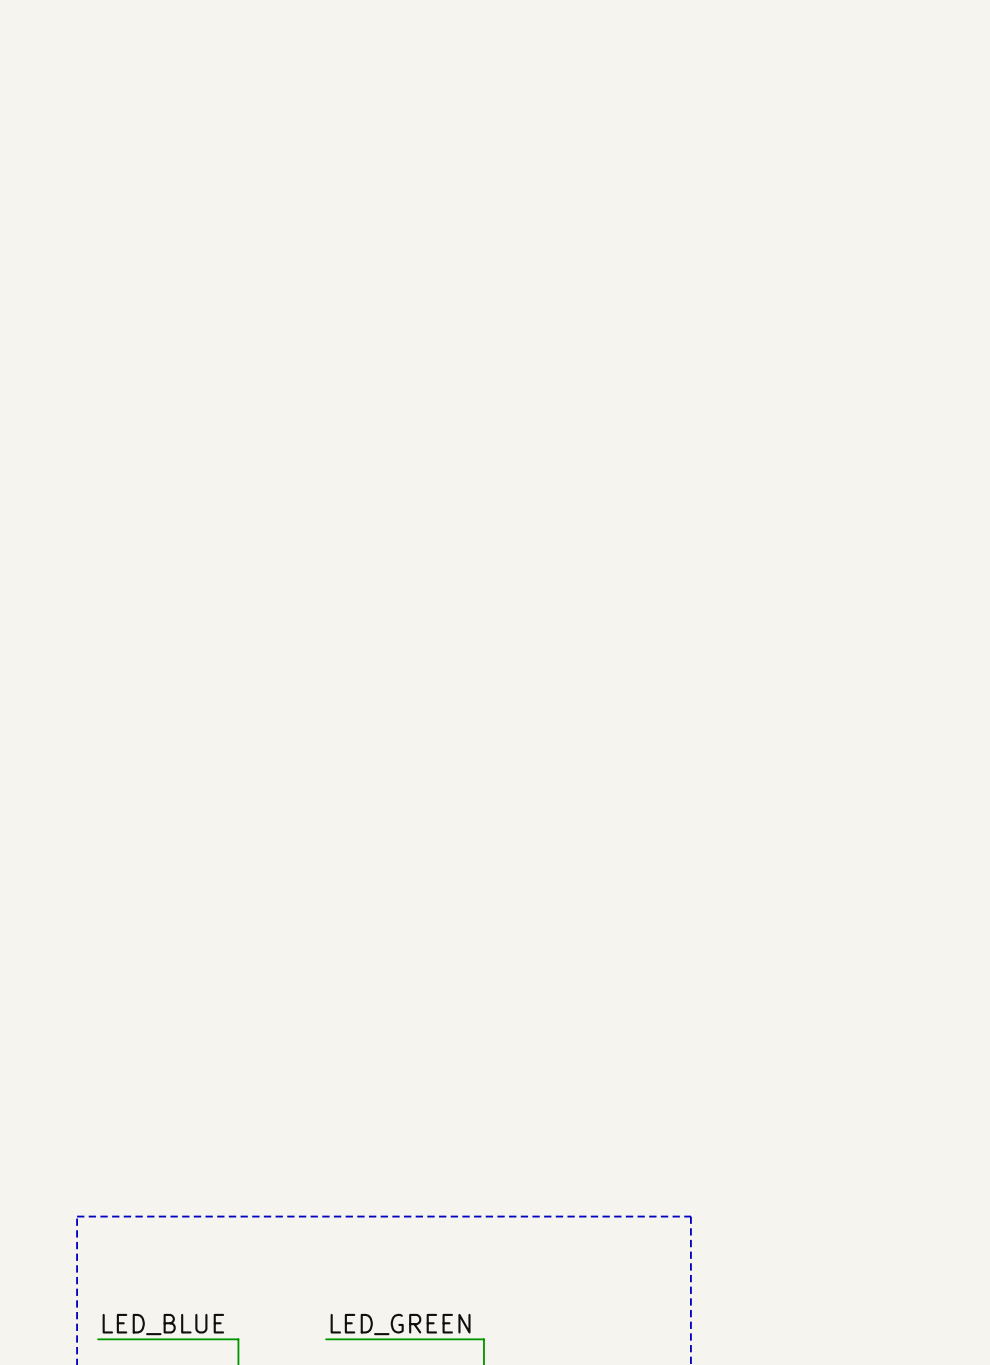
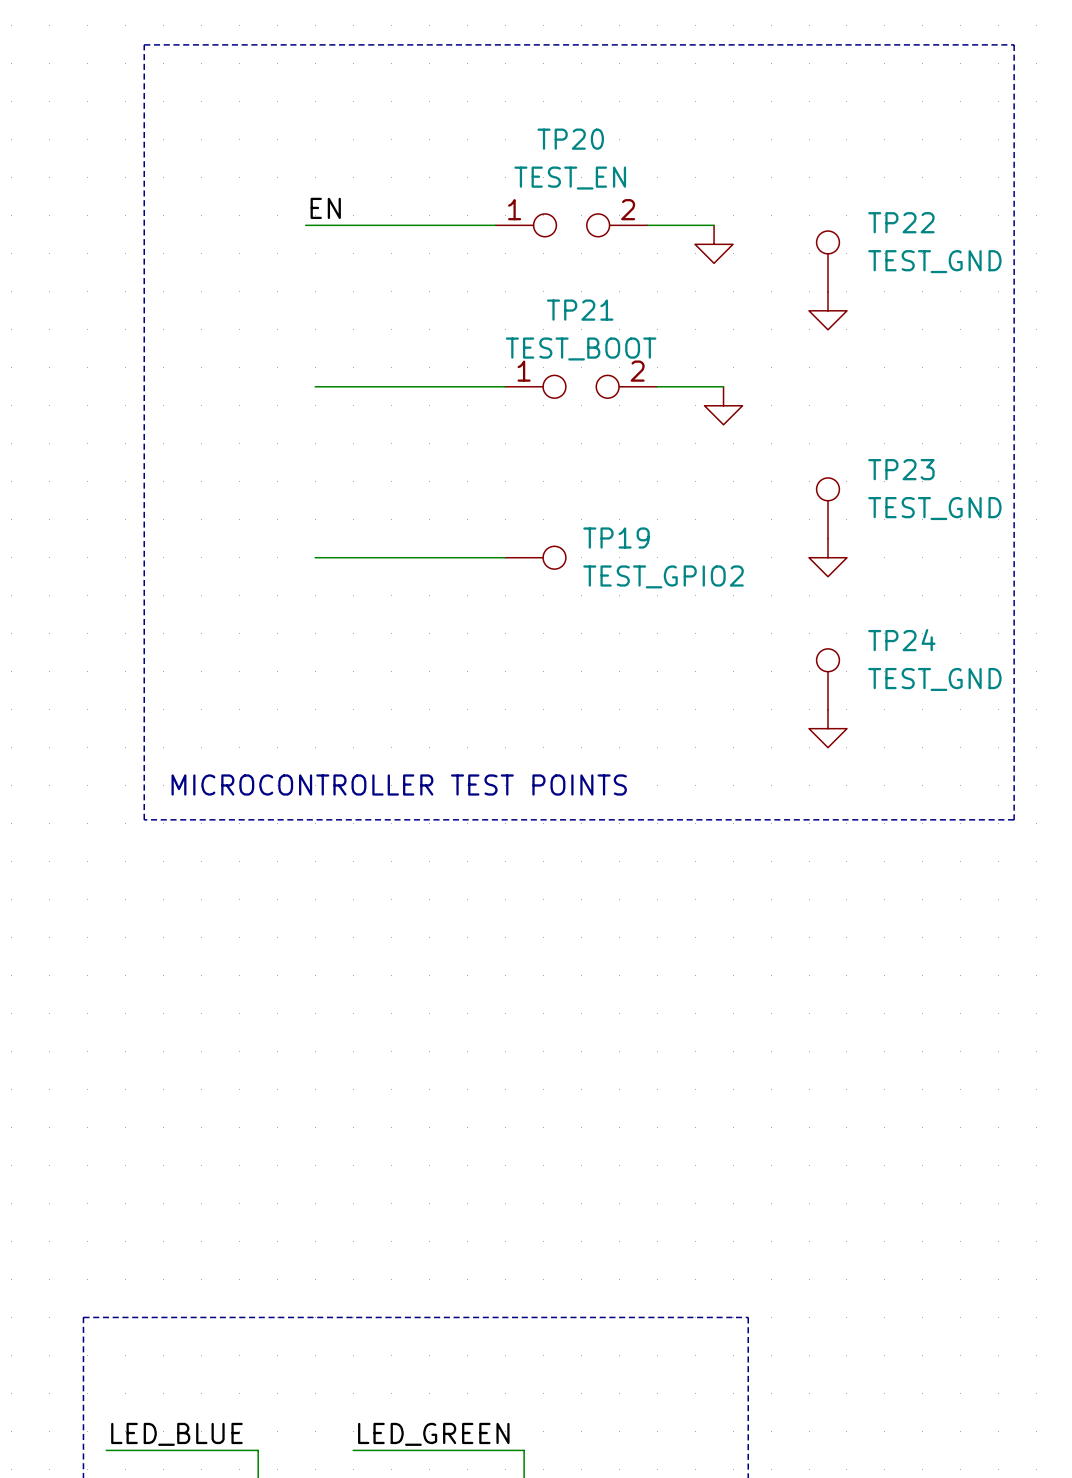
line: none -> (144, 44) (1014, 44) (1014, 819) (144, 819) (144, 44)
label: none -> EN (325, 208)
wire: none -> (305, 225) (495, 225)
TP20: none -> TEST_EN (571, 225)
wire: none -> (647, 225) (714, 225)
power symbol: none -> (714, 244)
TP22: none -> TEST_GND (828, 261)
power symbol: none -> (828, 310)
wire: none -> (315, 386) (505, 386)
TP21: none -> TEST_BOOT (581, 386)
wire: none -> (657, 386) (723, 386)
power symbol: none -> (723, 405)
TP23: none -> TEST_GND (828, 508)
wire: none -> (315, 557) (505, 557)
TP19: none -> TEST_GPIO2 (535, 557)
power symbol: none -> (828, 557)
TP24: none -> TEST_GND (828, 679)
power symbol: none -> (828, 728)
text: none -> MICROCONTROLLER TEST POINTS (399, 784)

